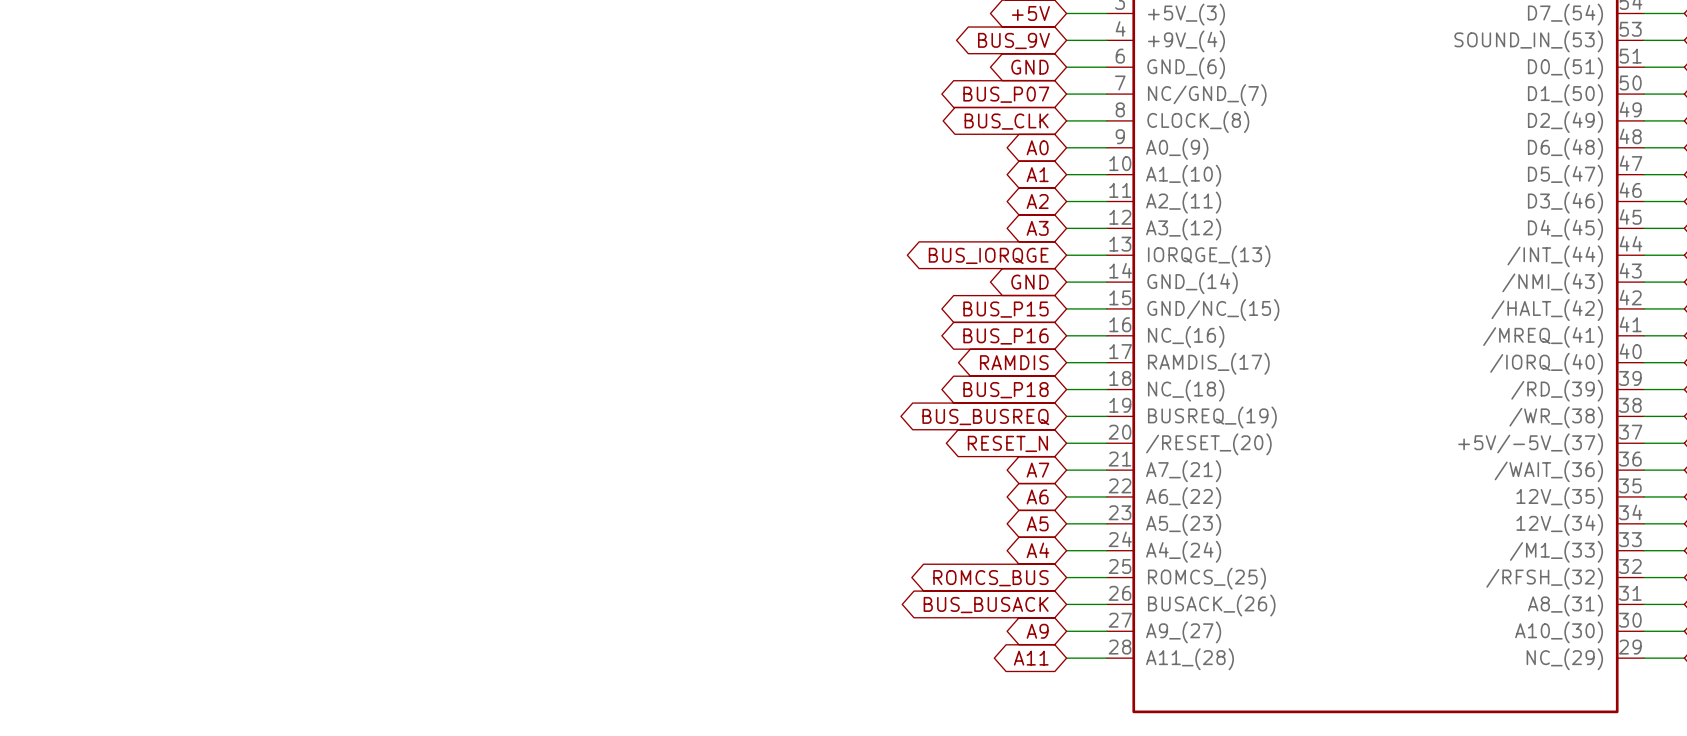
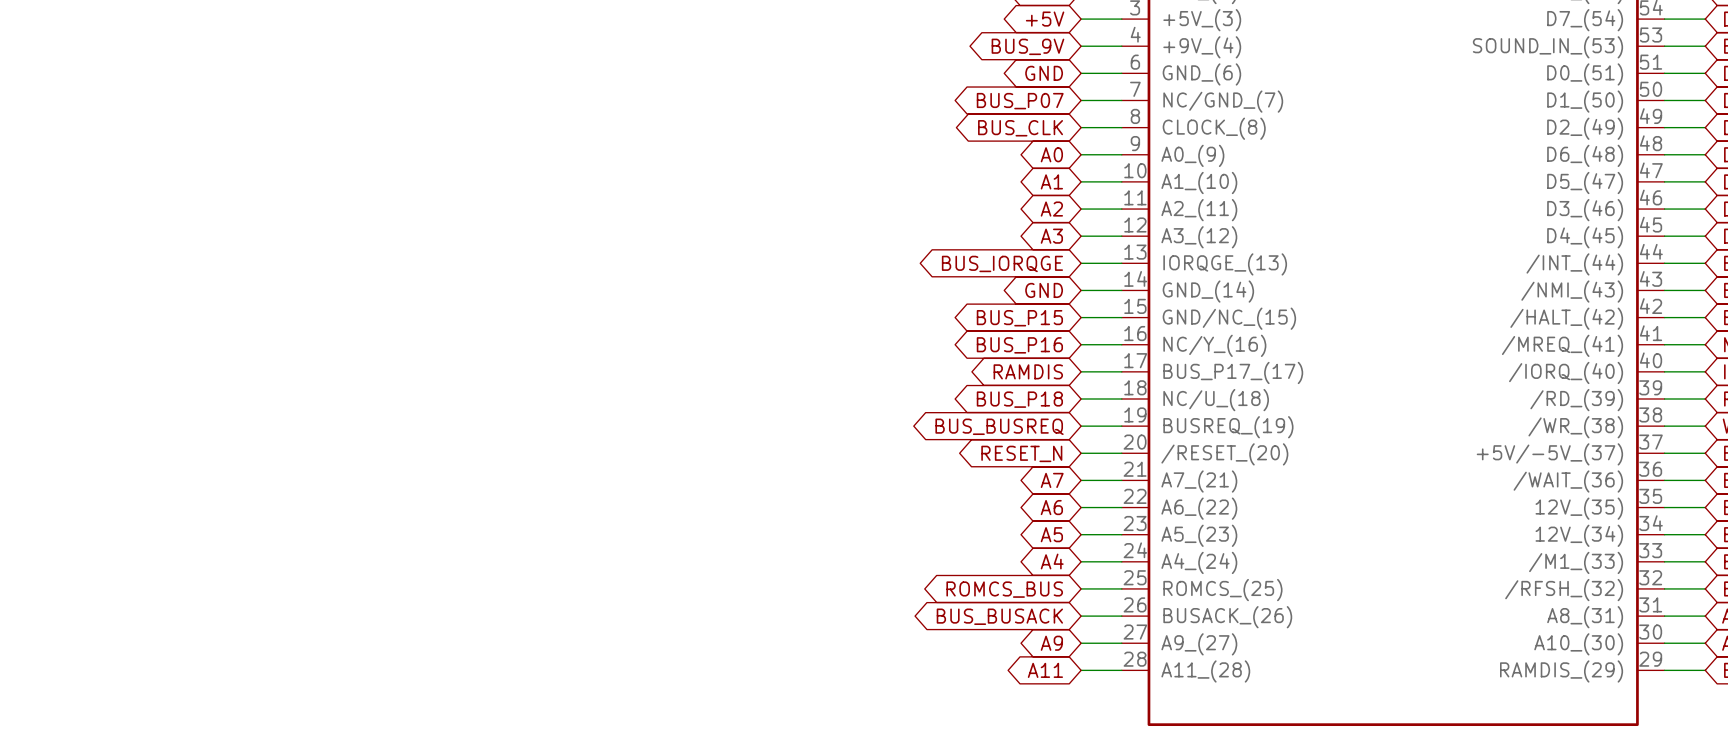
part pin name: NC_(16) (1186, 336) -> NC/Y_(16) (1214, 345)
part pin name: RAMDIS_(17) (1208, 363) -> BUS_P17_(17) (1233, 372)
part pin name: NC_(18) (1186, 390) -> NC/U_(18) (1216, 400)
part pin name: NC_(29) (1564, 659) -> RAMDIS_(29) (1561, 671)

